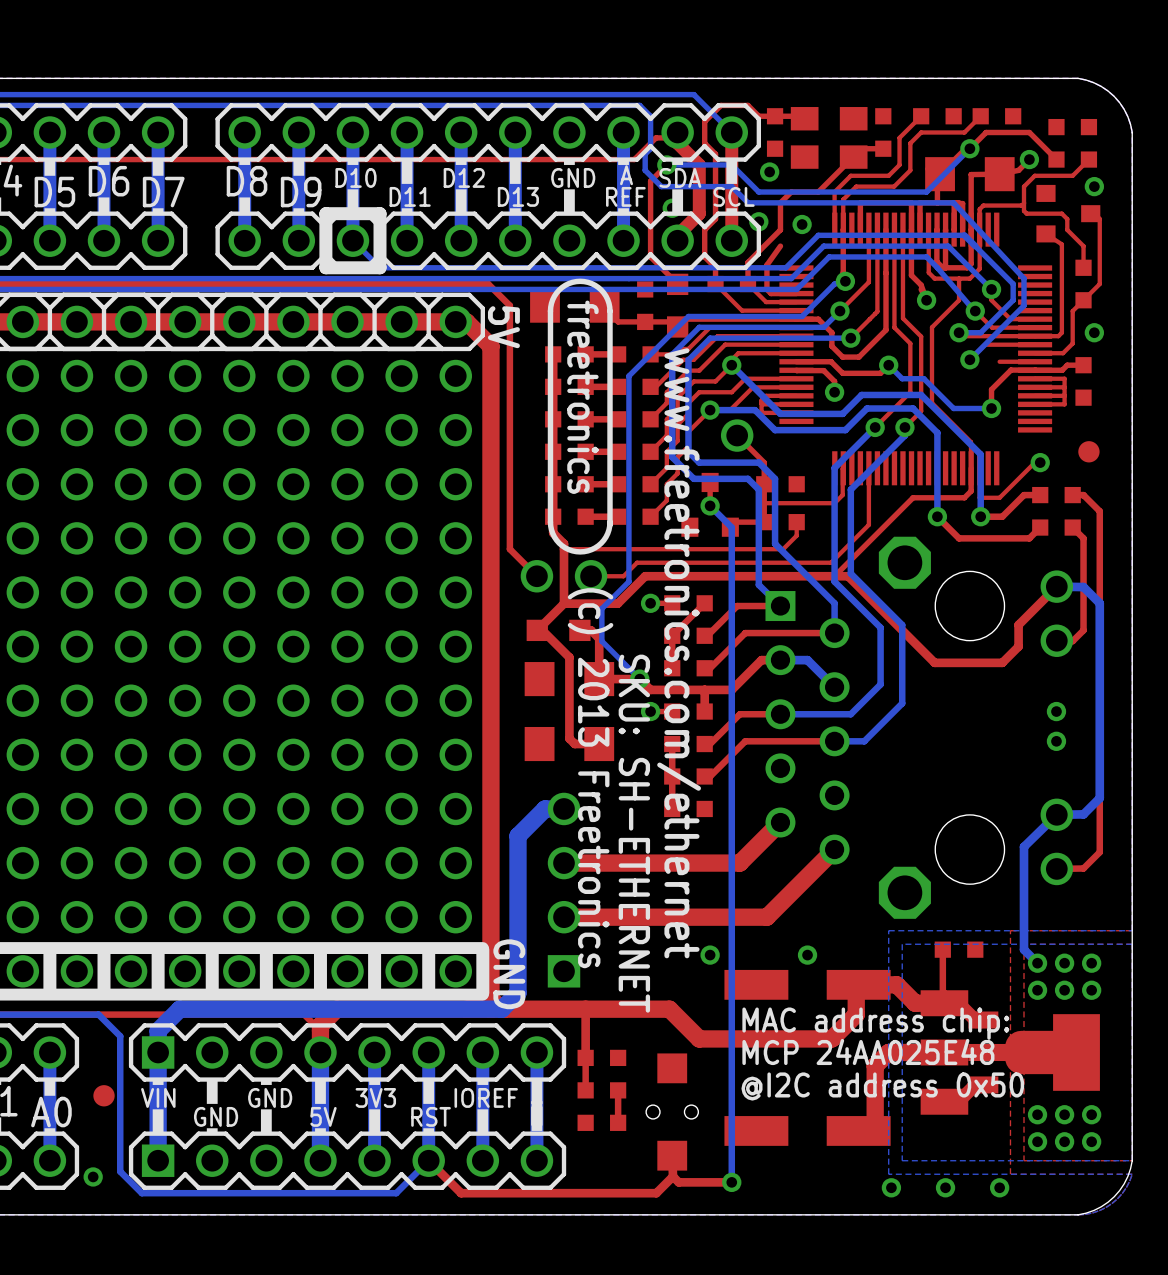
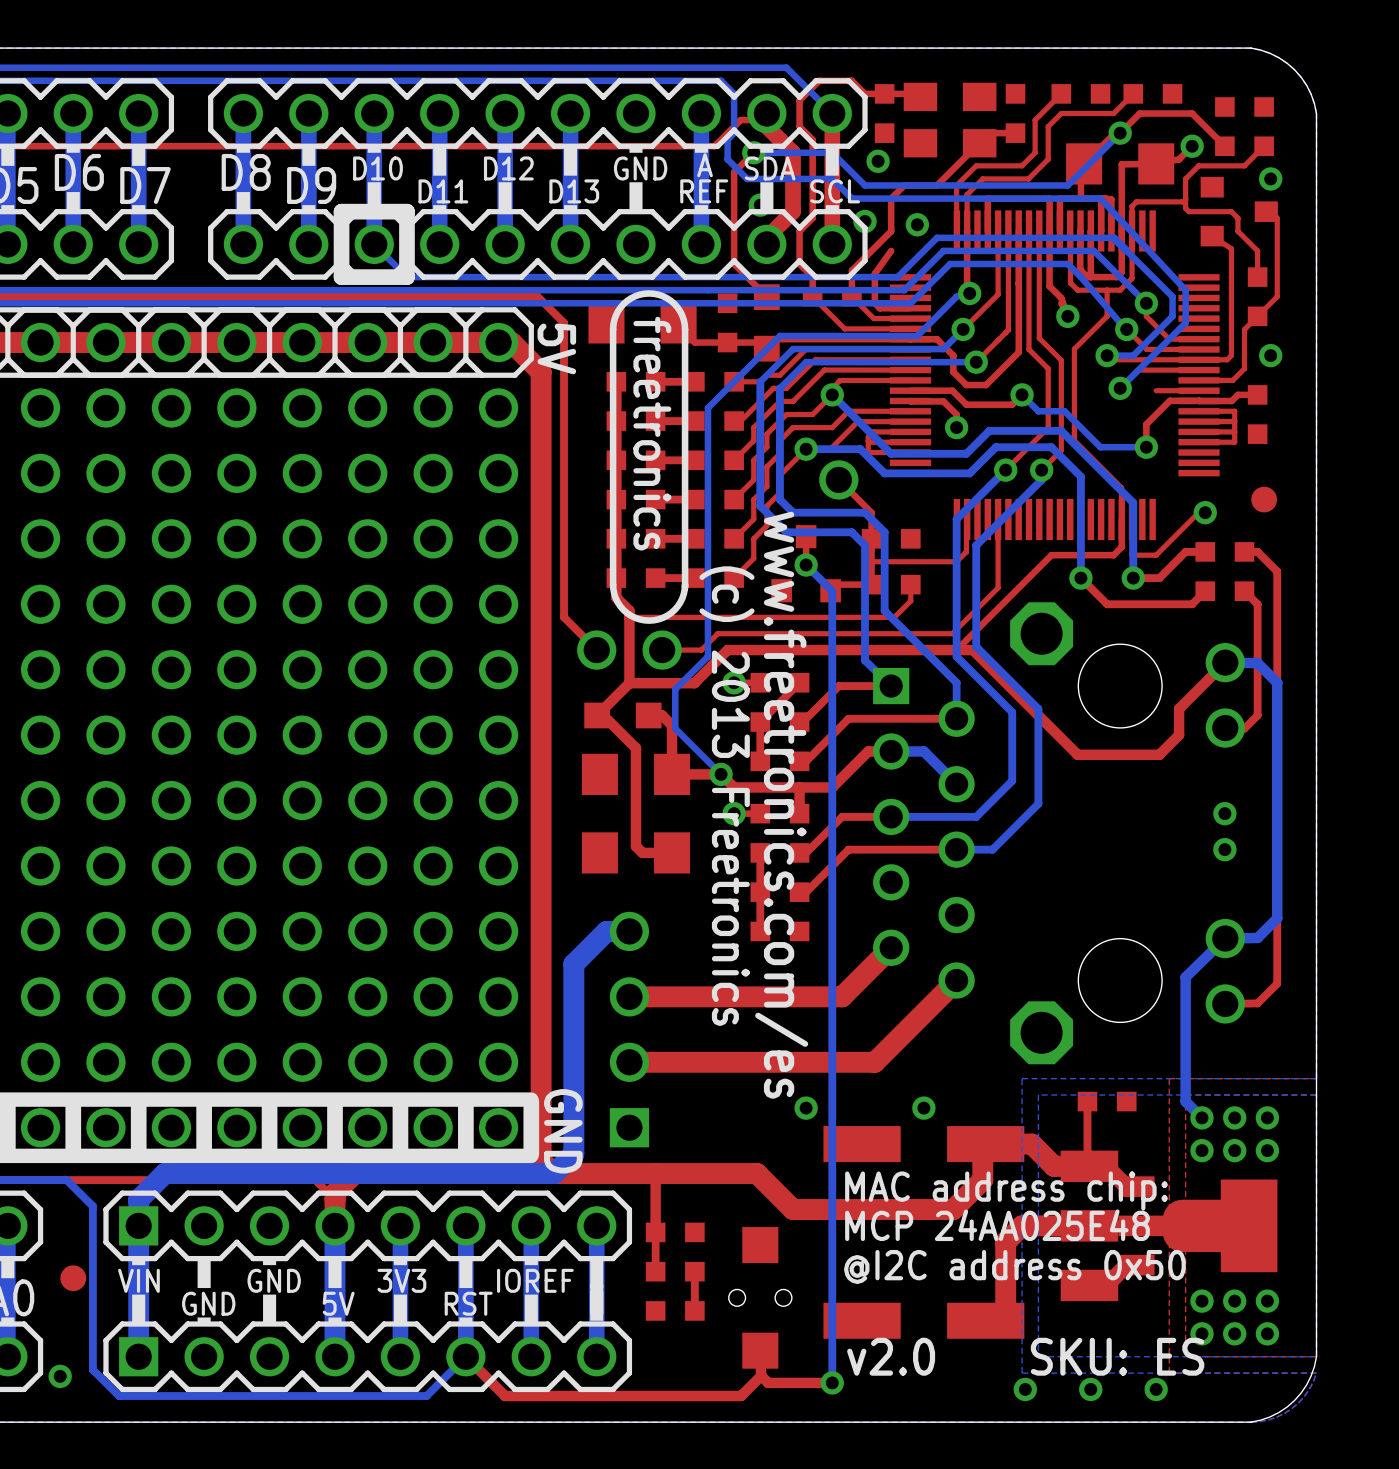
text: www.freetronics.com/ethernet (679, 653) -> www.freetronics.com/es (781, 805)
text position: (c) 2013 Freetronics (590, 778) -> (c) 2013 Freetronics (726, 796)
text: SKU: SH-ETHERNET (634, 833) -> none
text: none -> v2.0 SKU: ES (1025, 1356)

